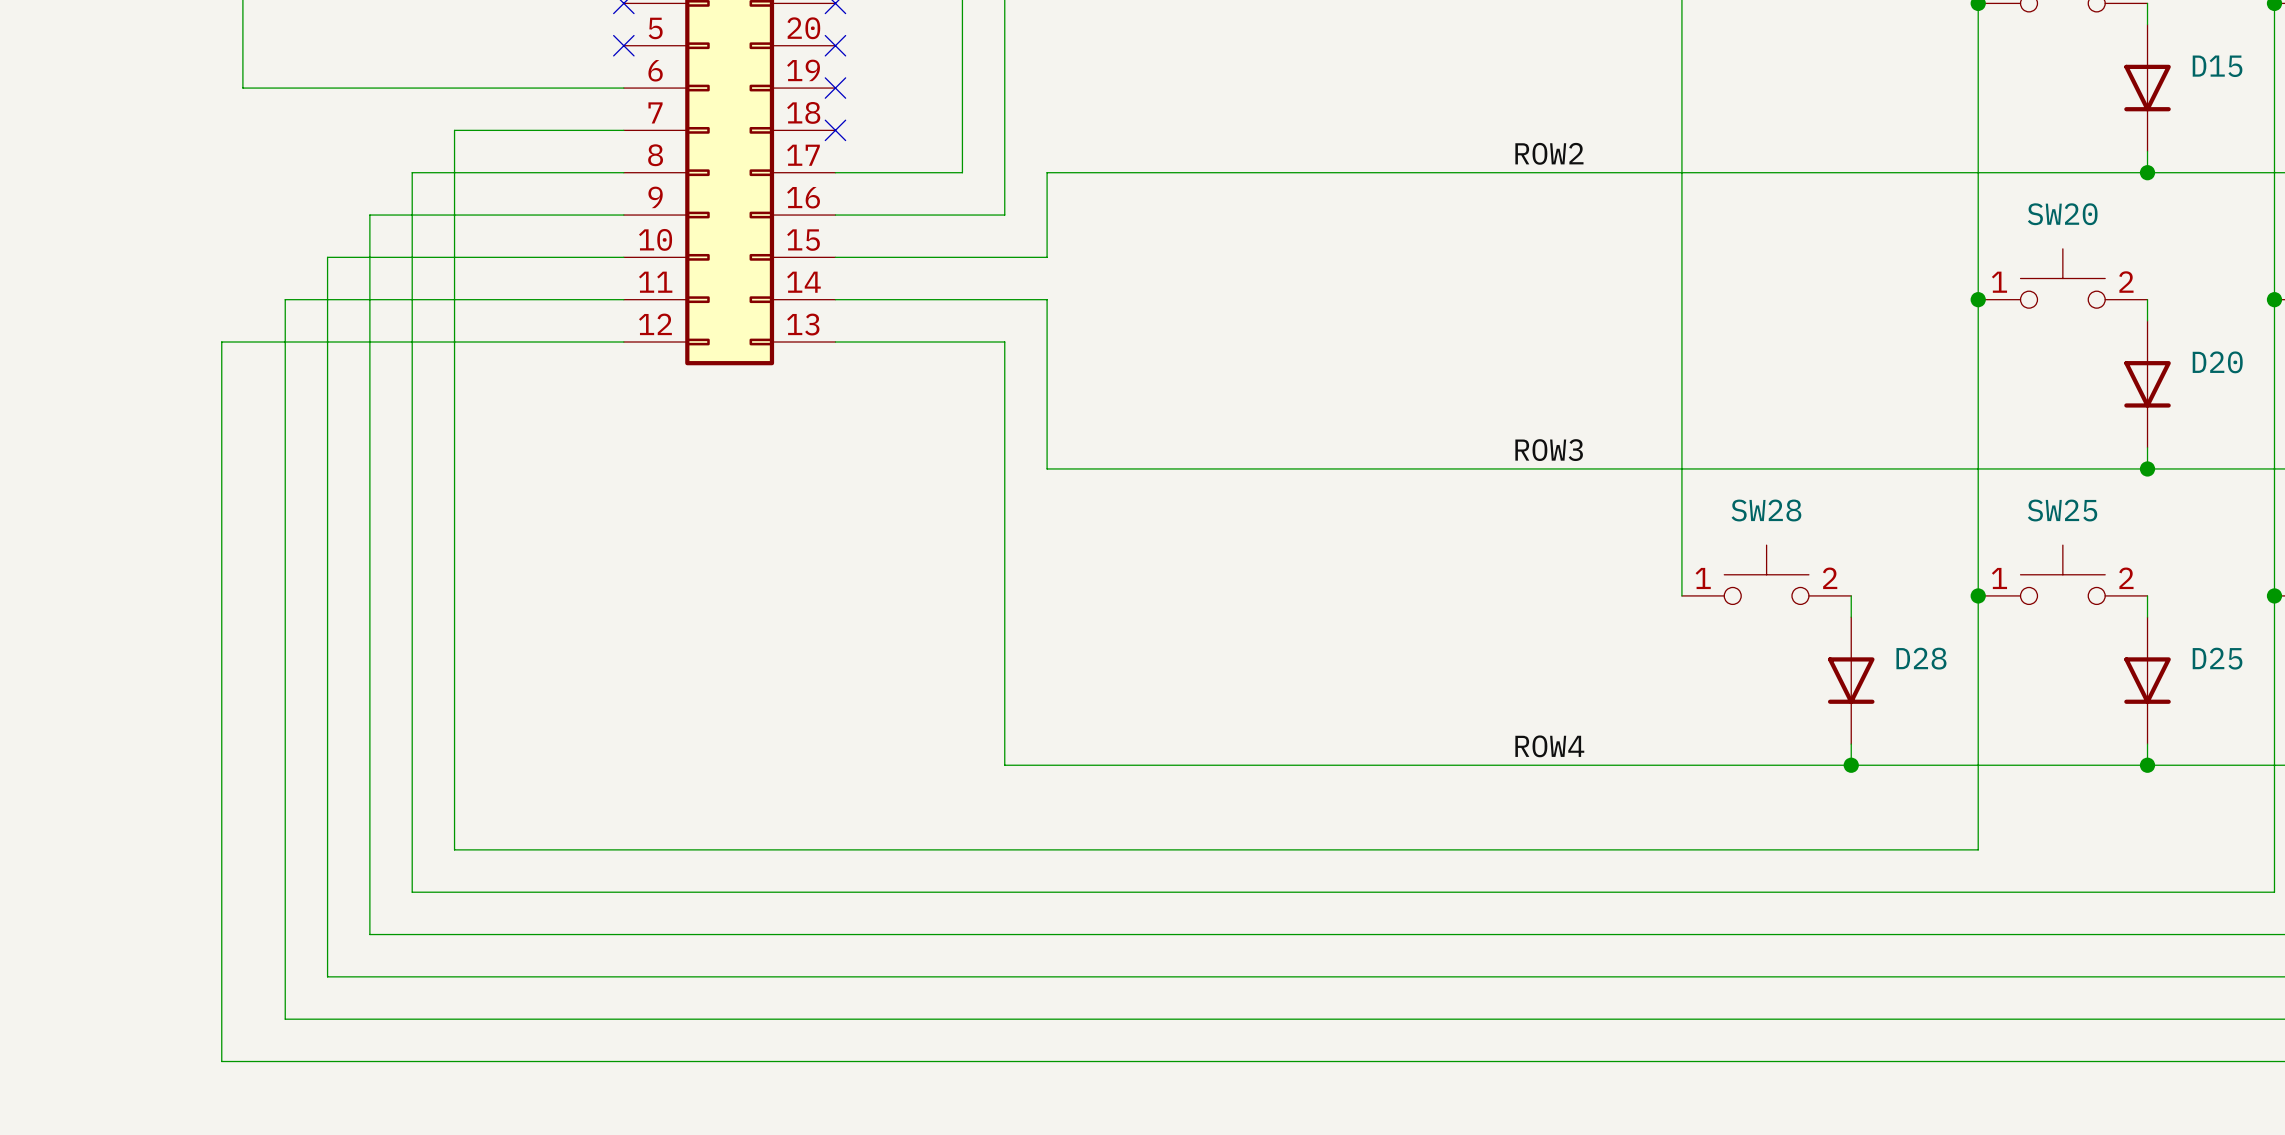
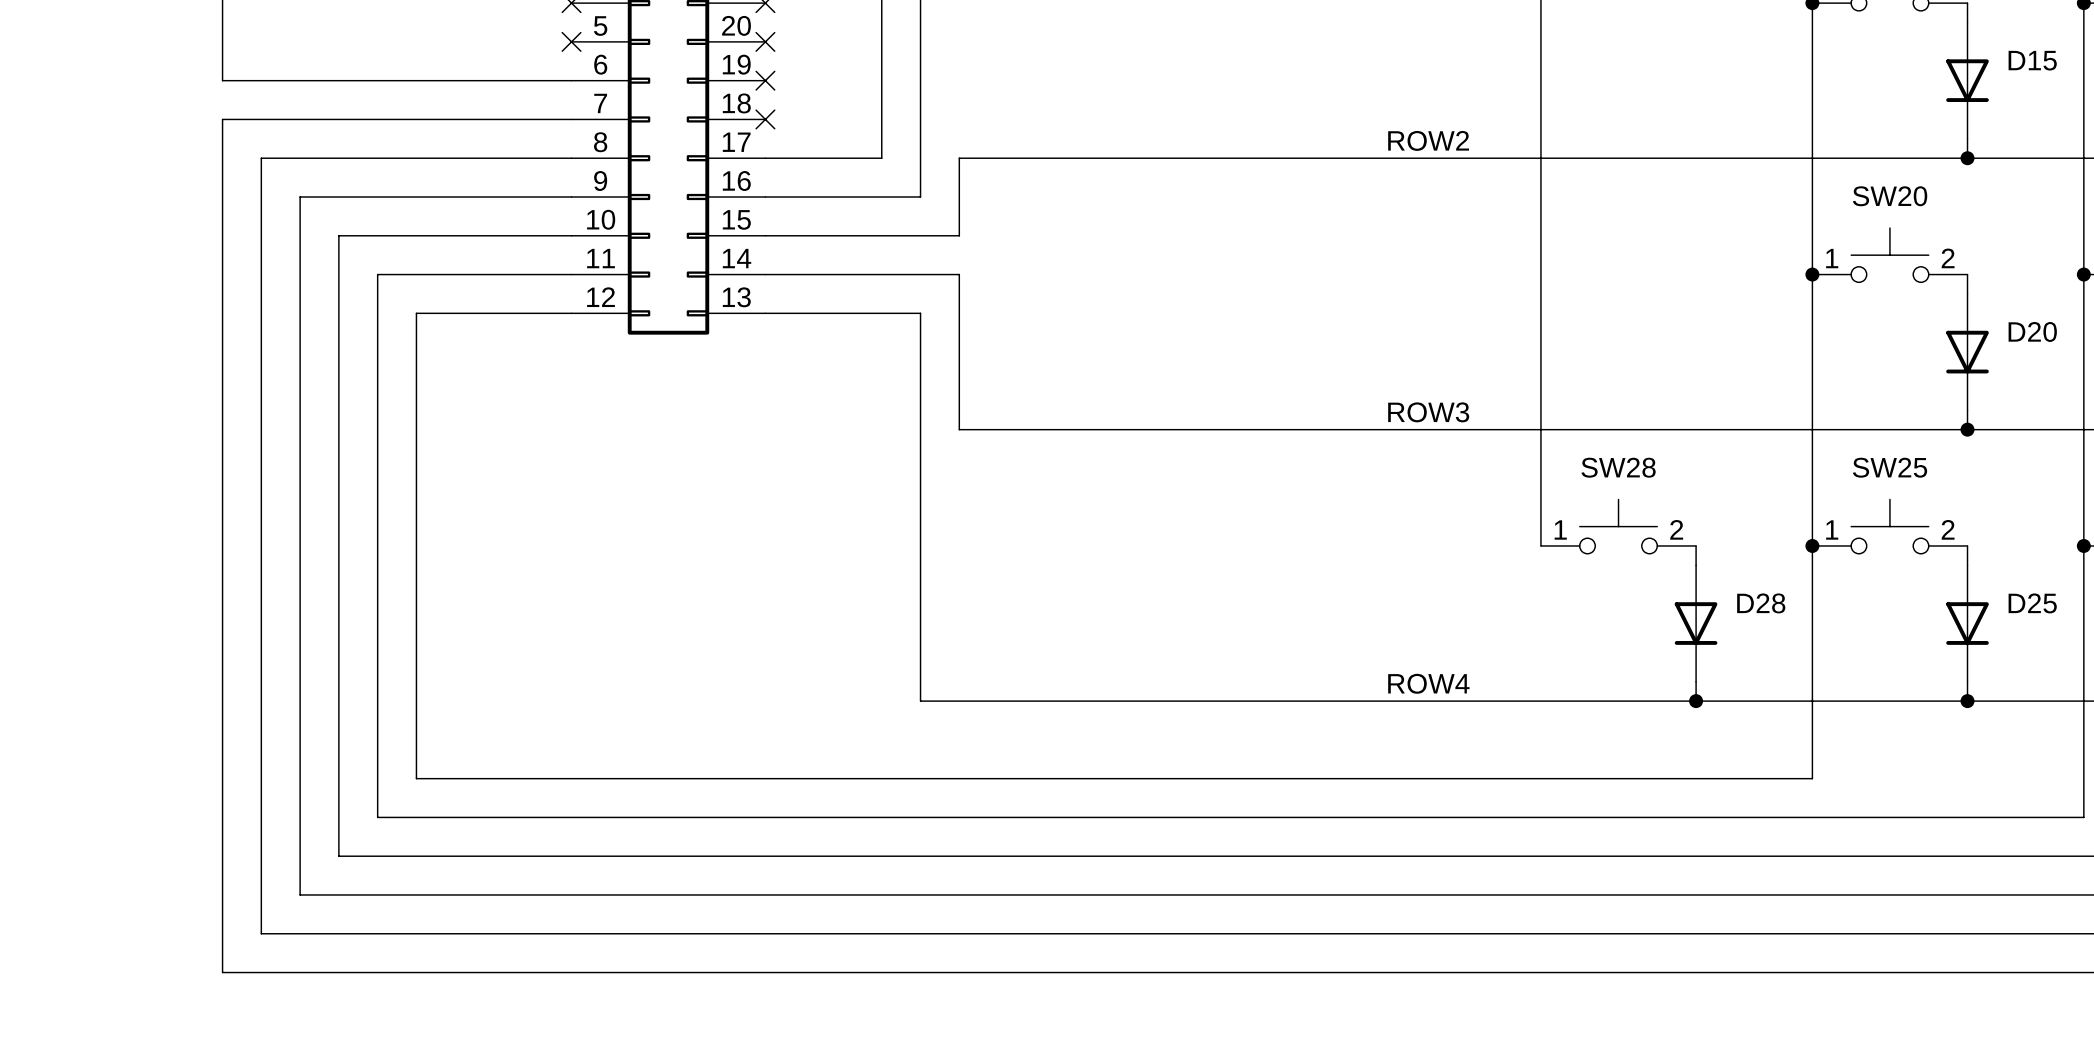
wire: (454, 130) (454, 341) (221, 341) (221, 1061) (242, 1061) -> (416, 119) (222, 119) (222, 972)
wire: (412, 172) (412, 299) (285, 299) -> (377, 158) (261, 158) (261, 274)
wire: (369, 215) (369, 257) (327, 257) -> (338, 197) (300, 197) (300, 235)

